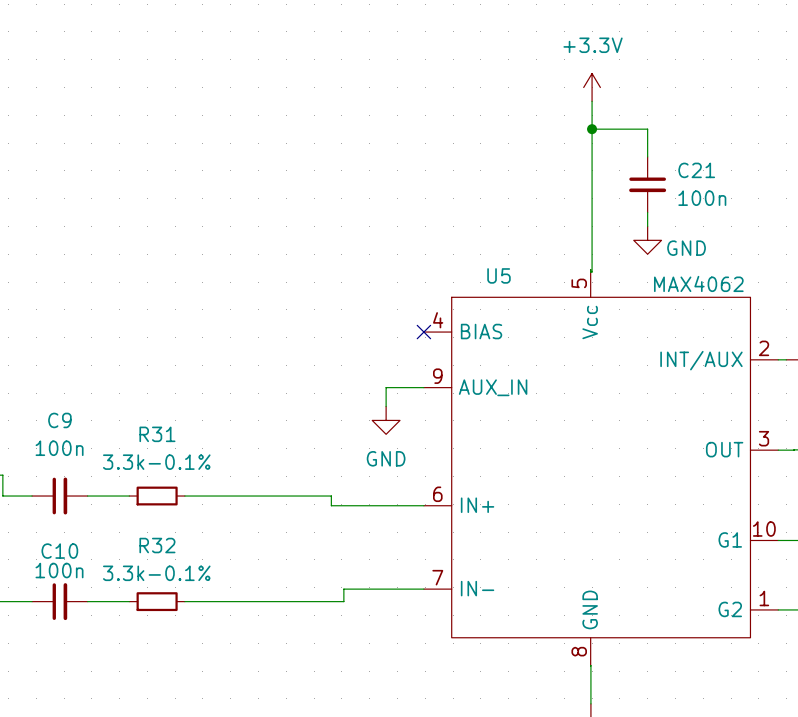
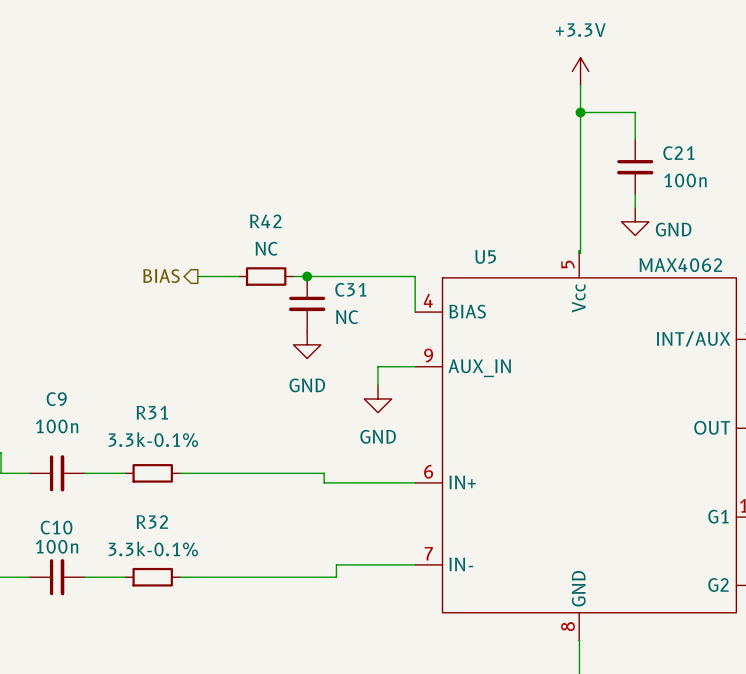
hierarchical label: none -> BIAS (161, 276)
wire: none -> (197, 276) (238, 276)
R42: none -> NC (266, 276)
wire: none -> (293, 276) (415, 276) (415, 312)
junction: none -> (307, 276)
C31: none -> NC (307, 303)
no-connect mark: (423, 332) -> none
power symbol: none -> GND (307, 344)

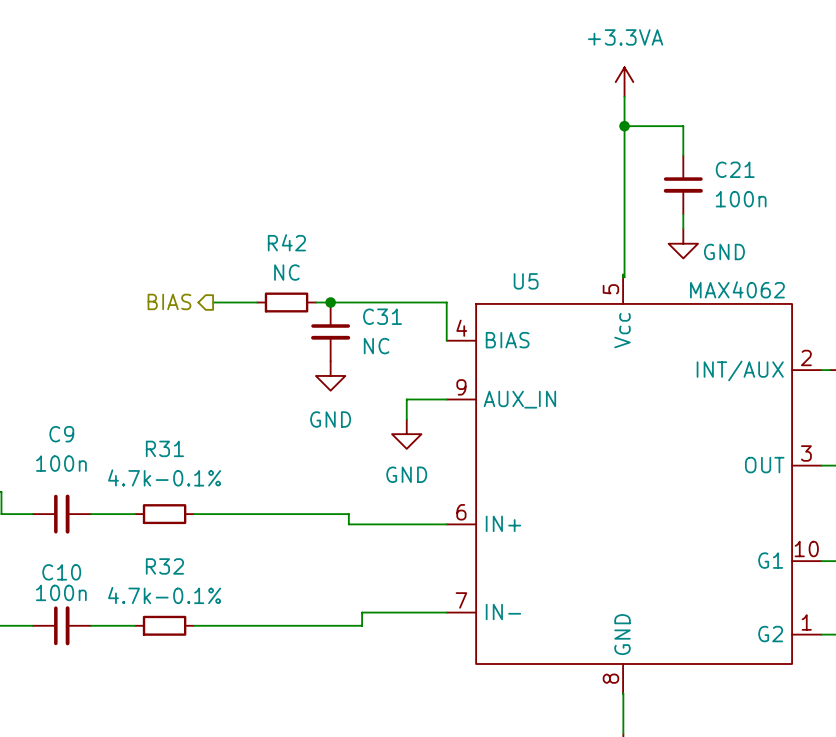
power symbol: +3.3V (580, 71) -> +3.3VA (624, 82)
R31 value: 3.3k-0.1% (153, 439) -> 4.7k-0.1% (164, 477)
R32 value: 3.3k-0.1% (153, 549) -> 4.7k-0.1% (164, 595)

